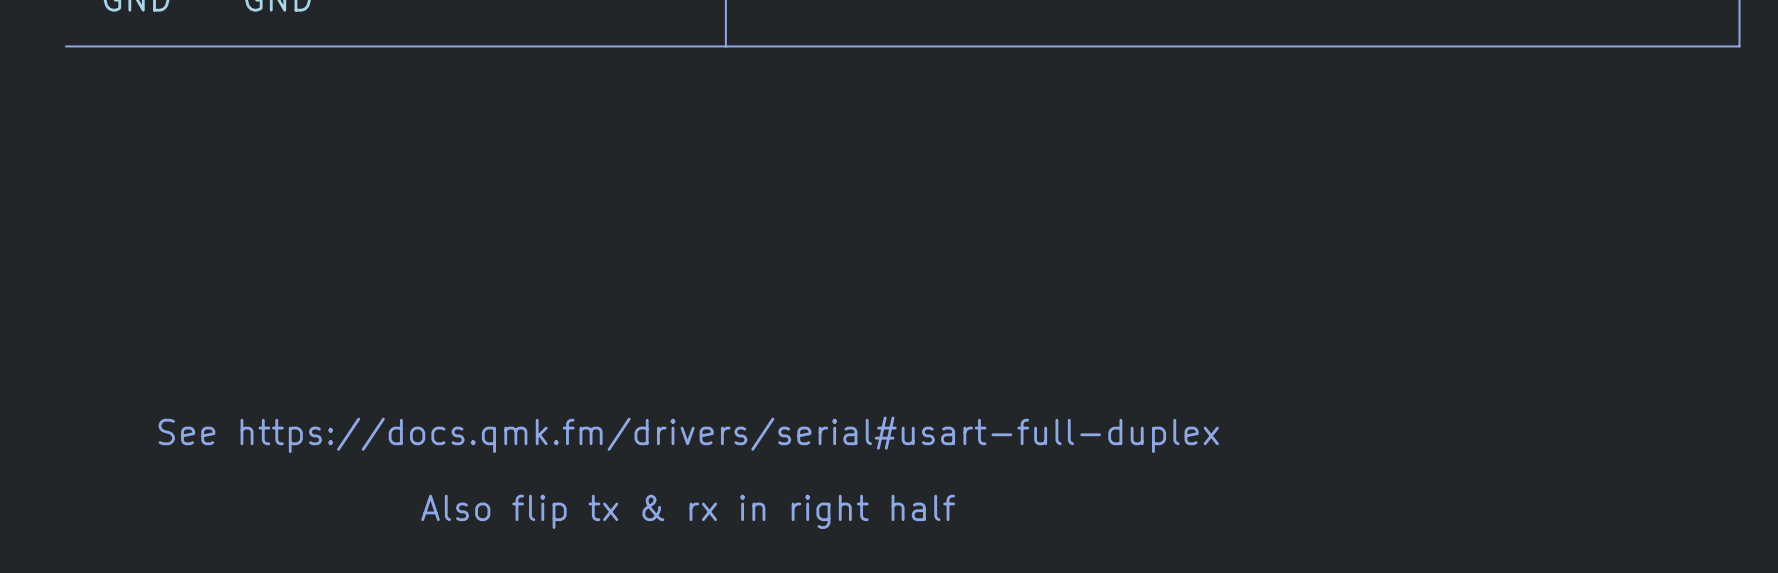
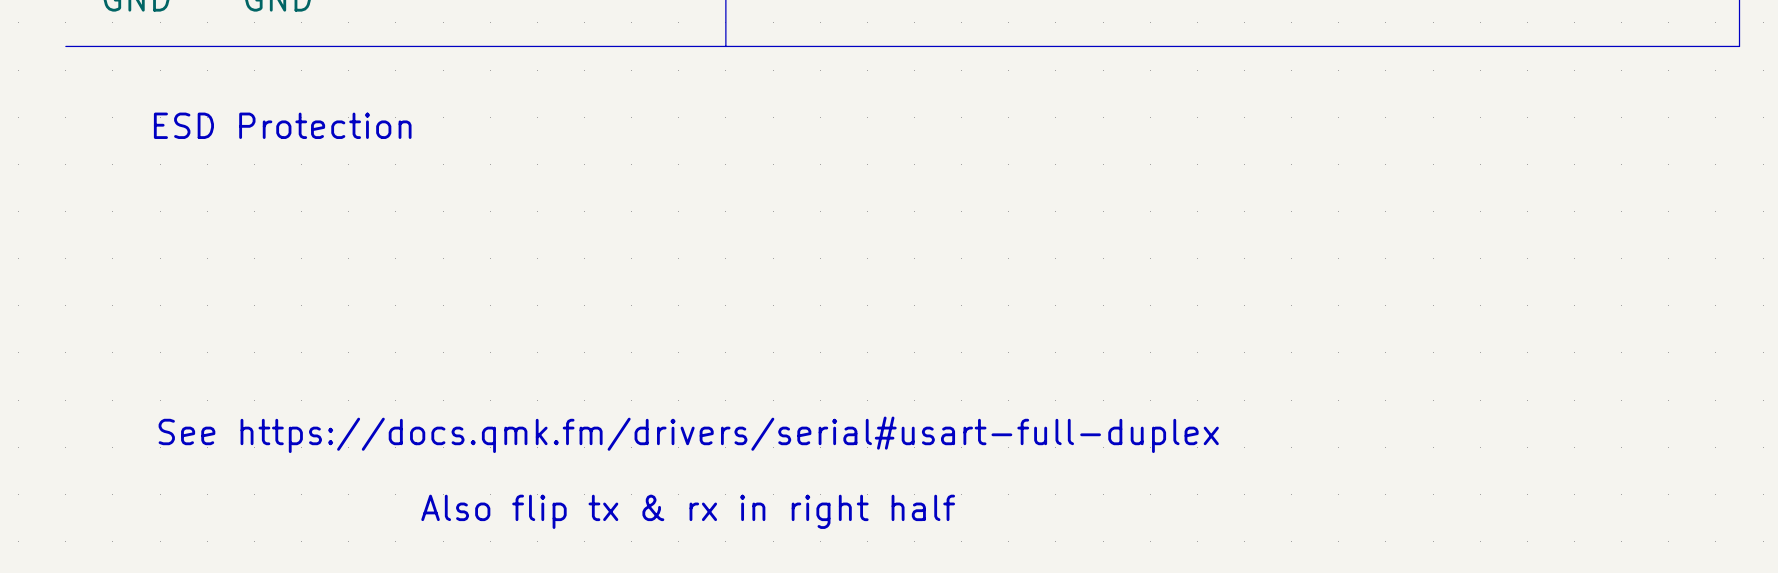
text: none -> ESD Protection (282, 125)

